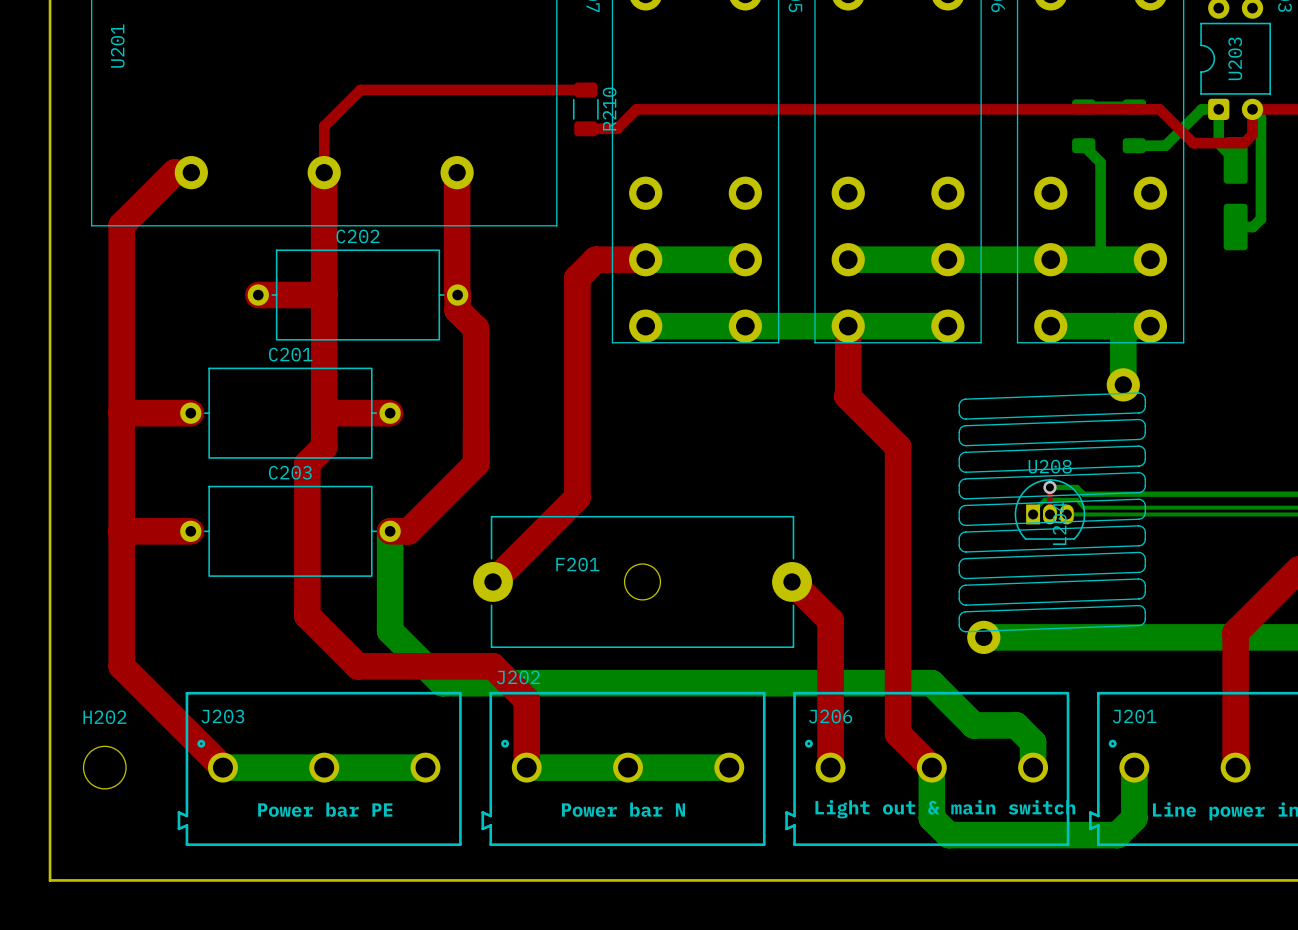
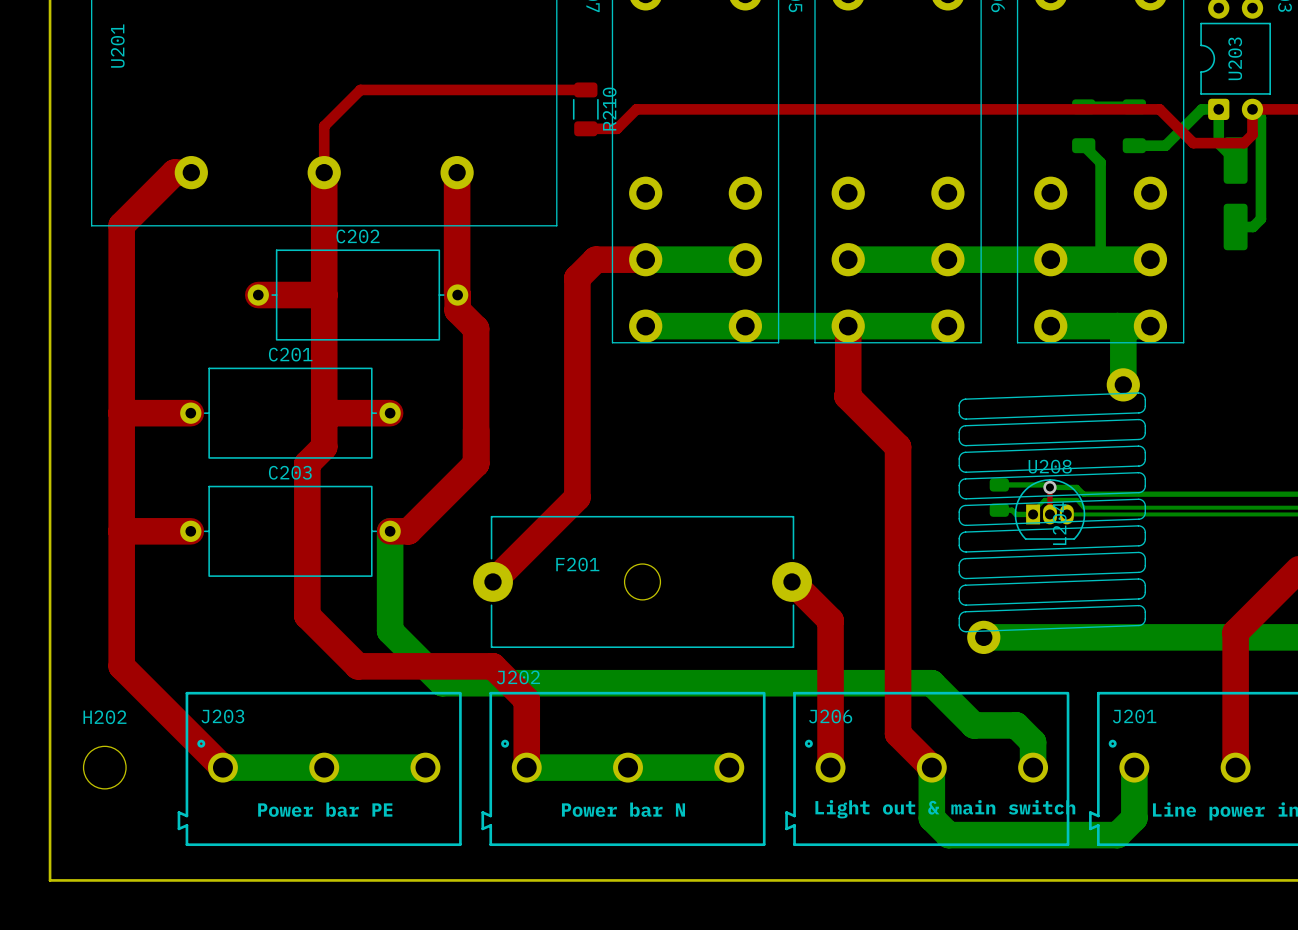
bottom track: none -> (999, 484) (1047, 484) (1049, 487)
part: none -> (999, 497)
bottom track: none -> (999, 510) (1011, 510) (1016, 514) (1033, 514)

